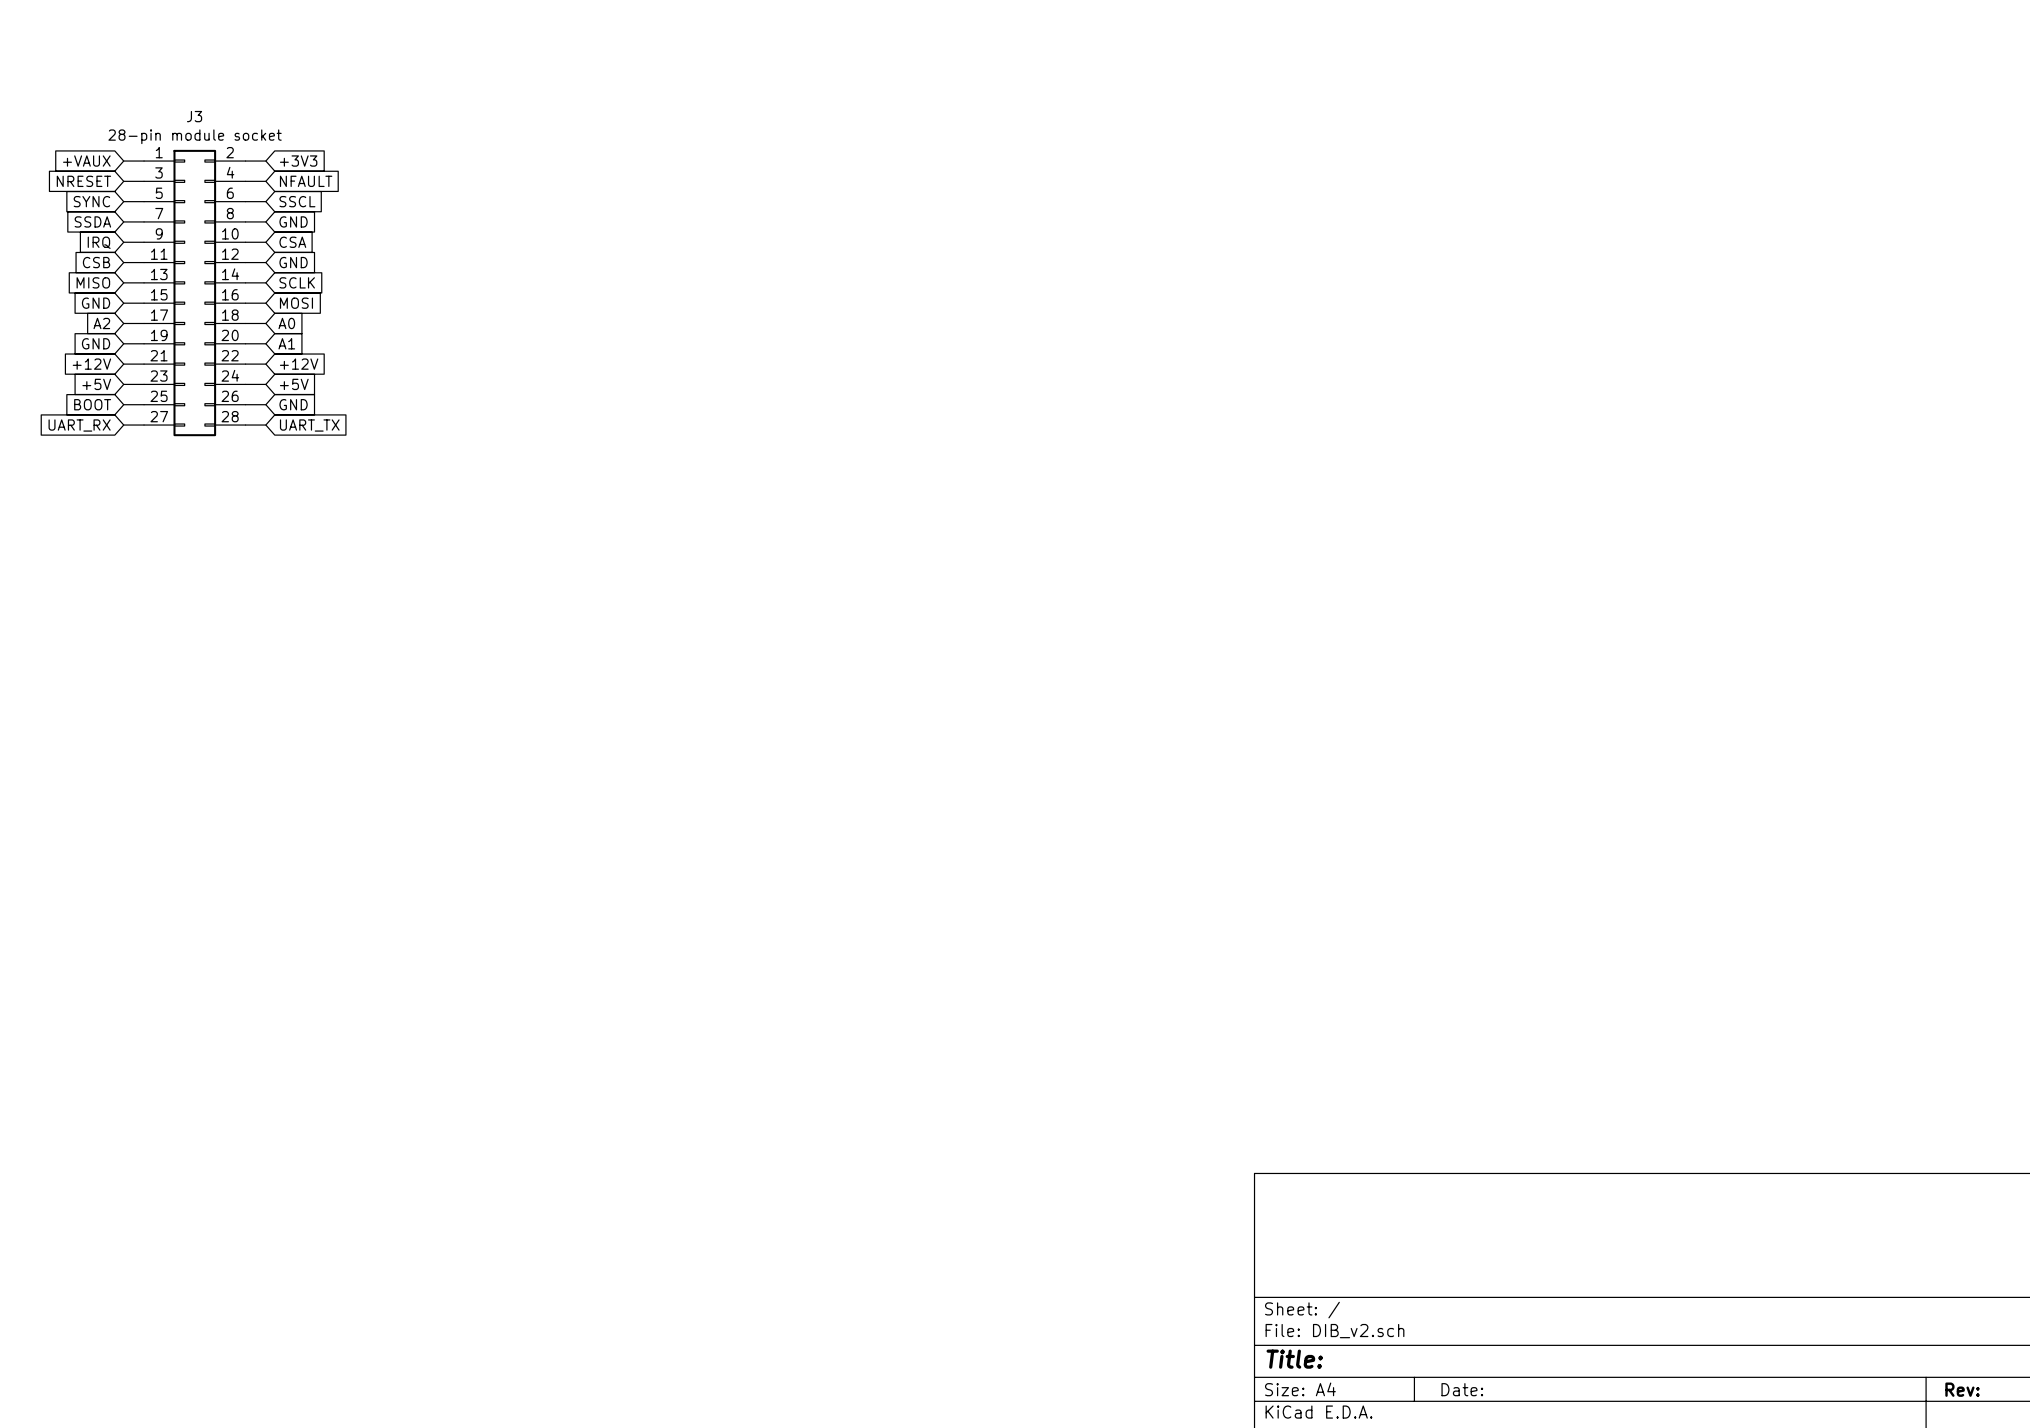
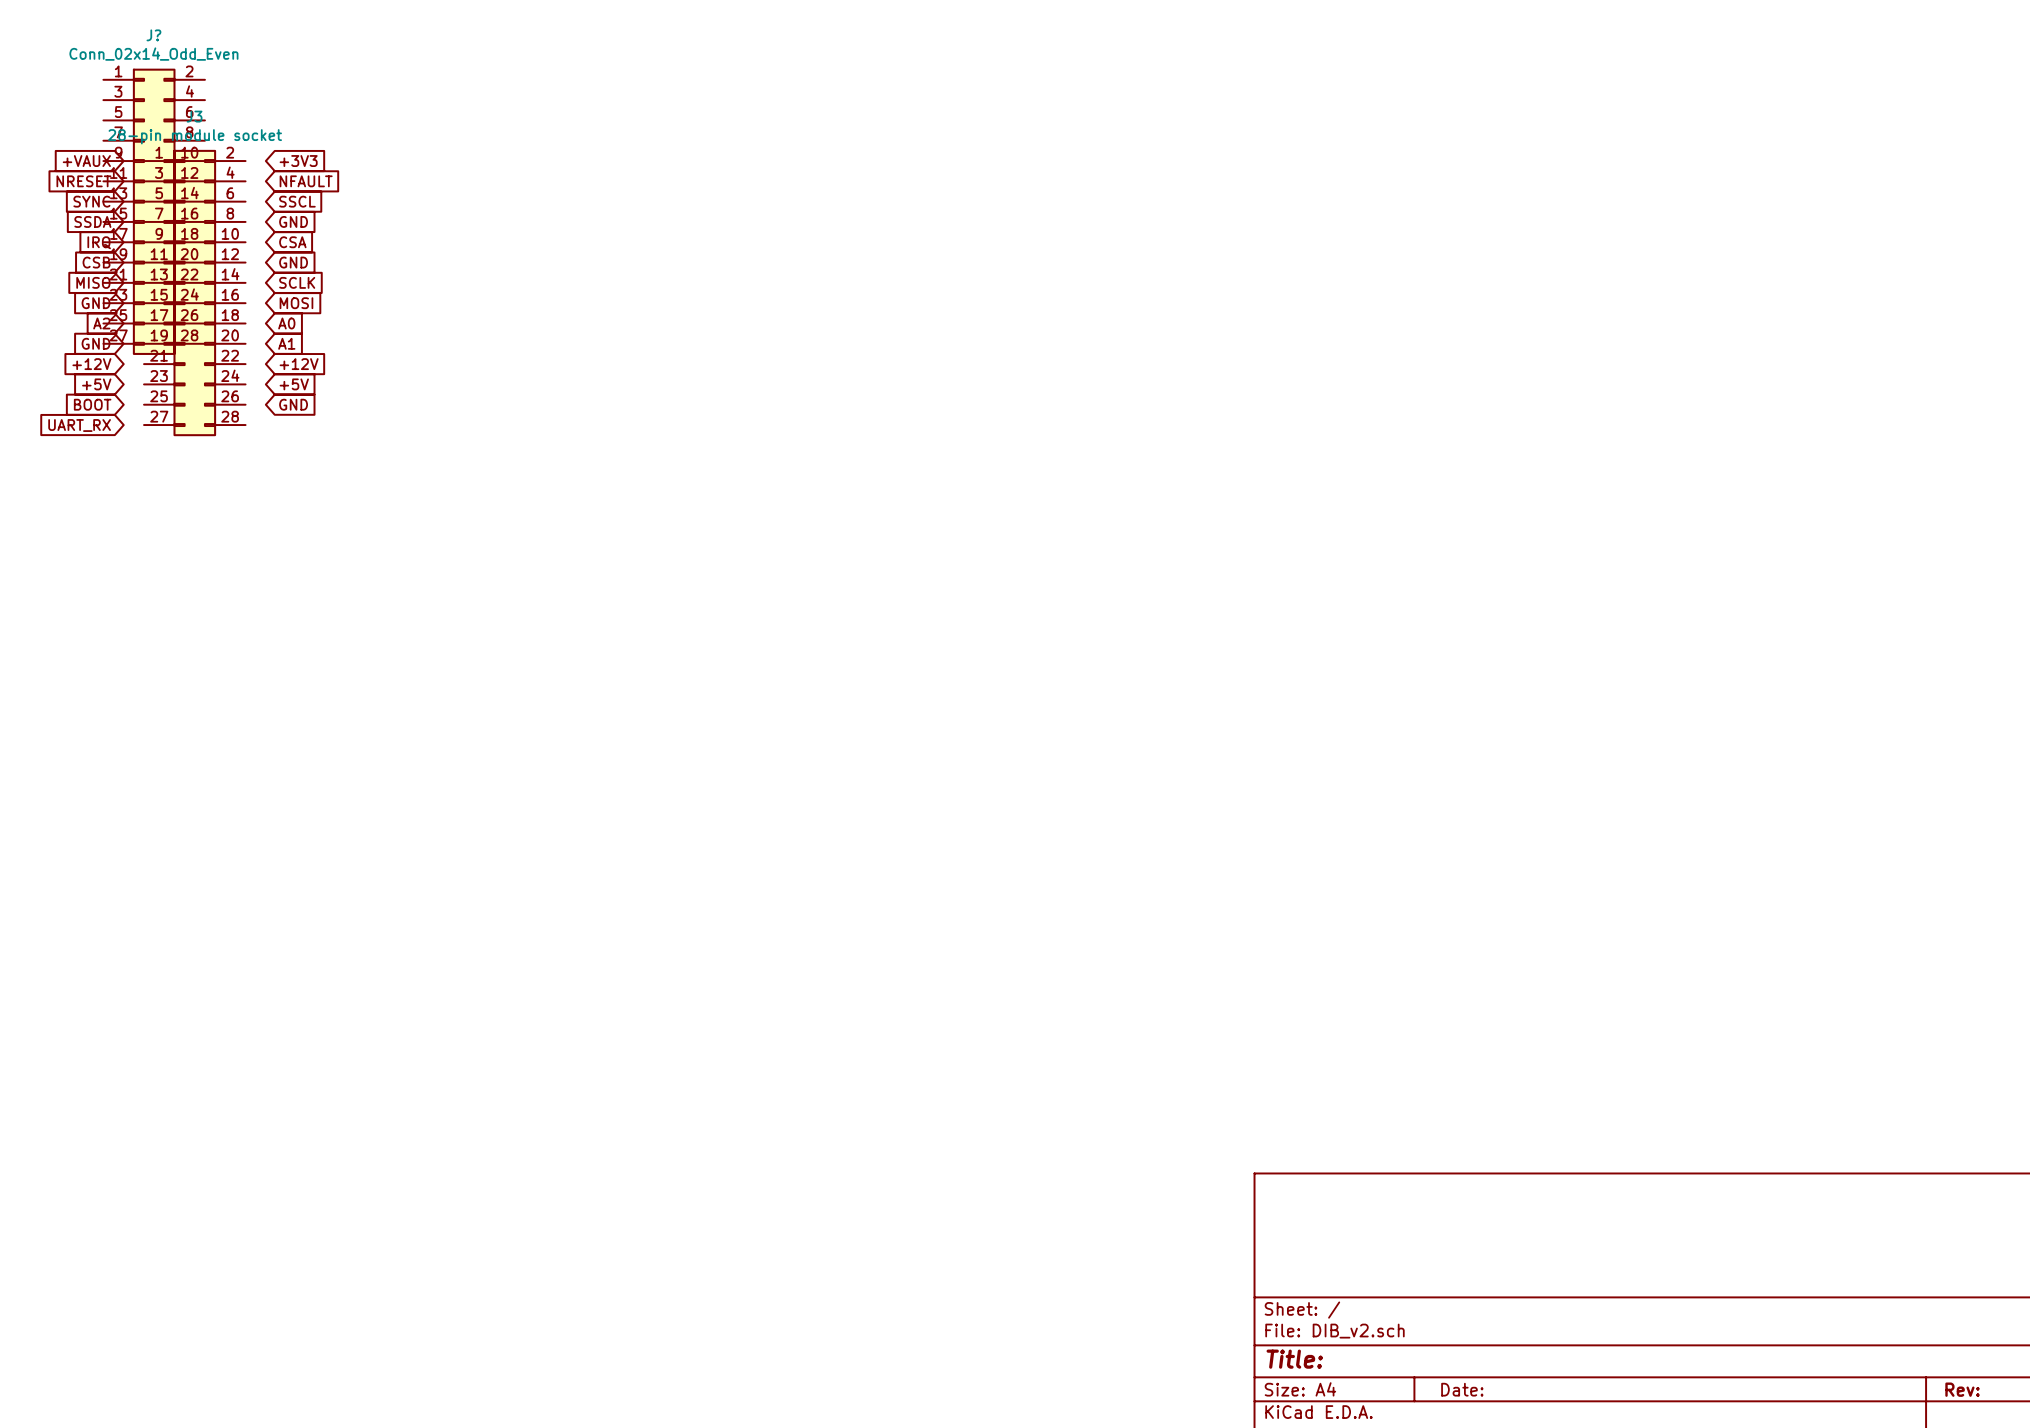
wire: (245, 161) (265, 161) -> none
wire: (245, 181) (265, 181) -> none
wire: (245, 201) (265, 201) -> none
J?: none -> Conn_02x14_Odd_Even (154, 211)
wire: (245, 221) (265, 221) -> none
wire: (245, 242) (265, 242) -> none
wire: (245, 262) (265, 262) -> none
wire: (245, 282) (265, 282) -> none
wire: (245, 303) (265, 303) -> none
wire: (245, 323) (265, 323) -> none
wire: (245, 343) (265, 343) -> none
wire: (123, 364) (144, 364) -> none
wire: (245, 364) (265, 364) -> none
wire: (123, 384) (144, 384) -> none
wire: (245, 384) (265, 384) -> none
wire: (123, 404) (144, 404) -> none
wire: (245, 404) (265, 404) -> none
wire: (123, 425) (144, 425) -> none
wire: (245, 425) (265, 425) -> none
global label: UART_TX (309, 425) -> none

